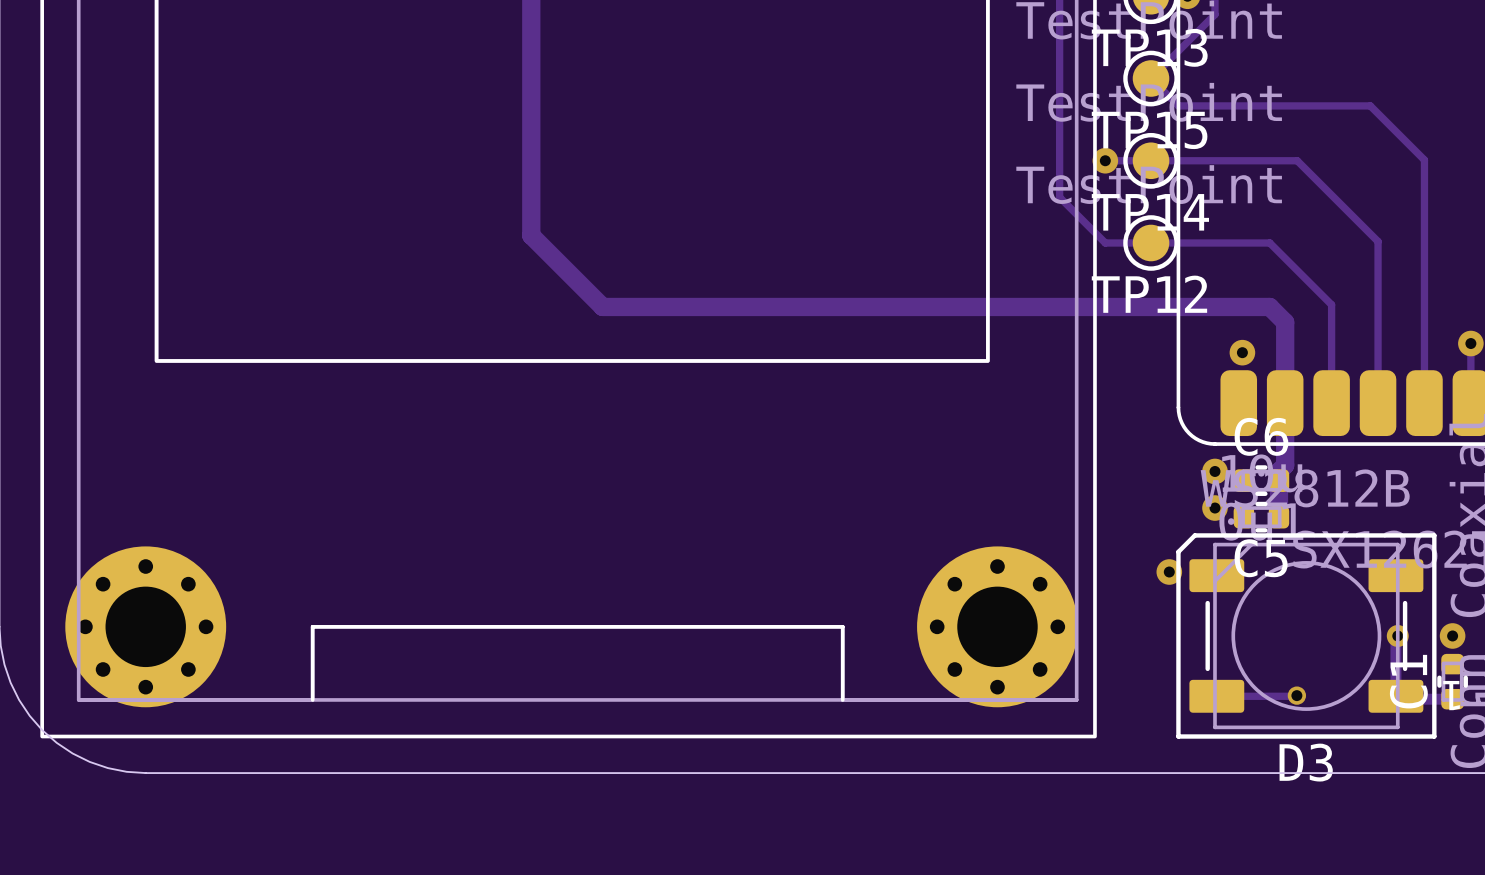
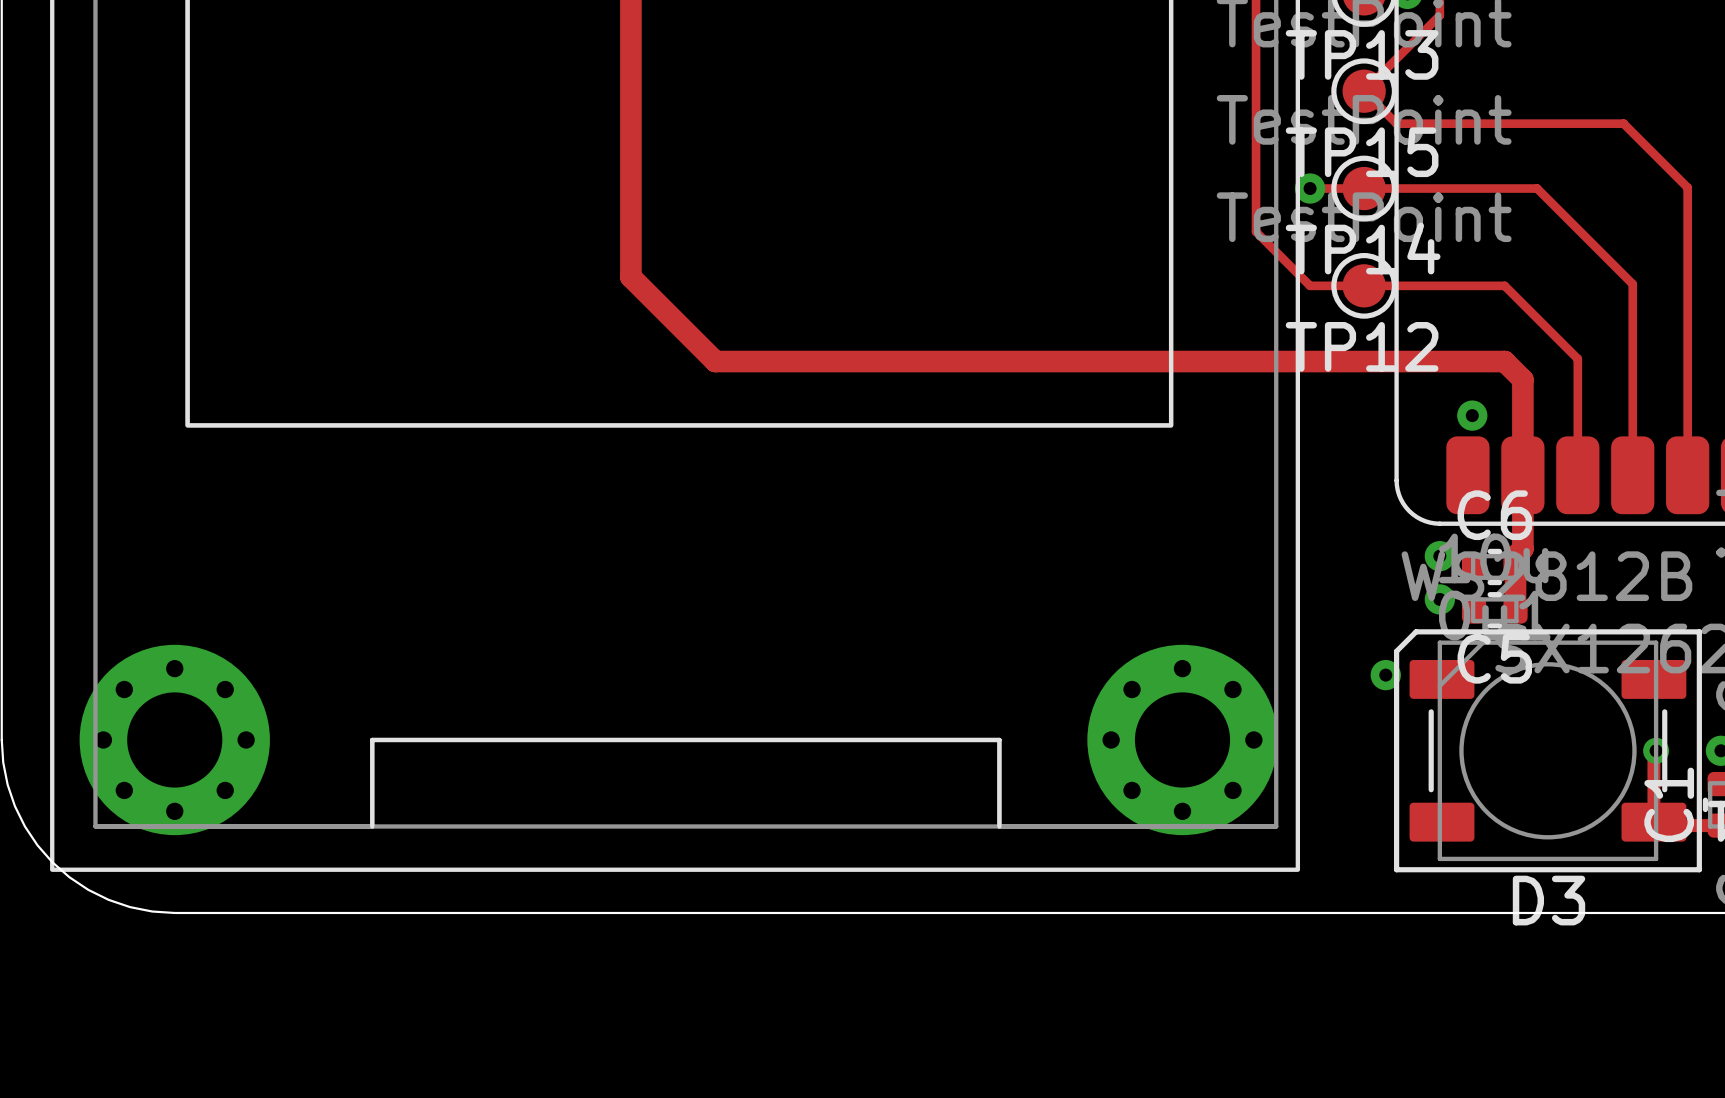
track: (1296, 695) (1216, 696) -> none
via: (1296, 695) -> none

